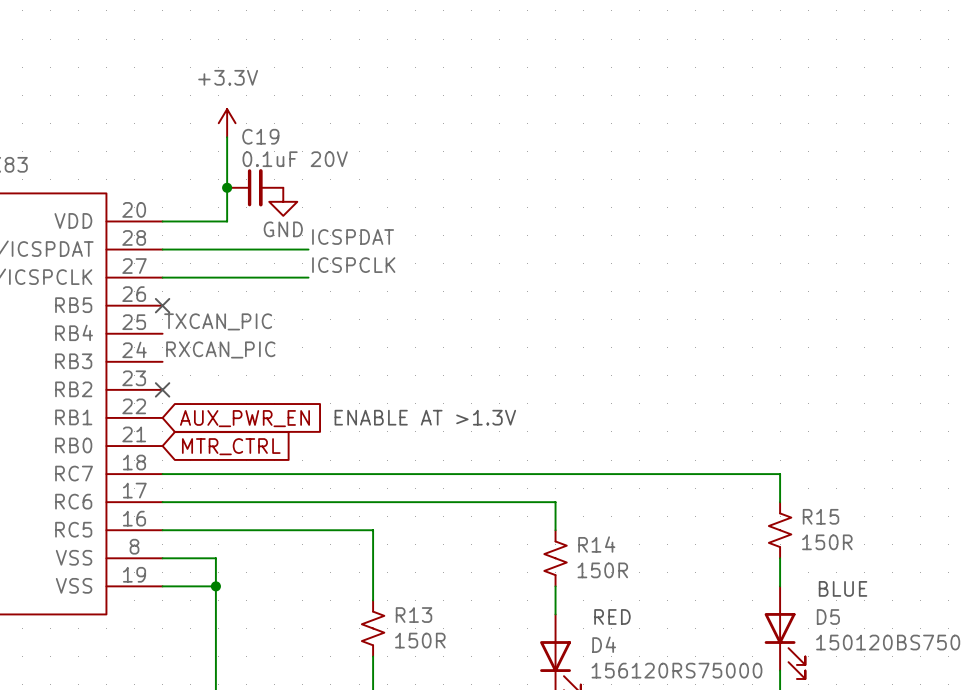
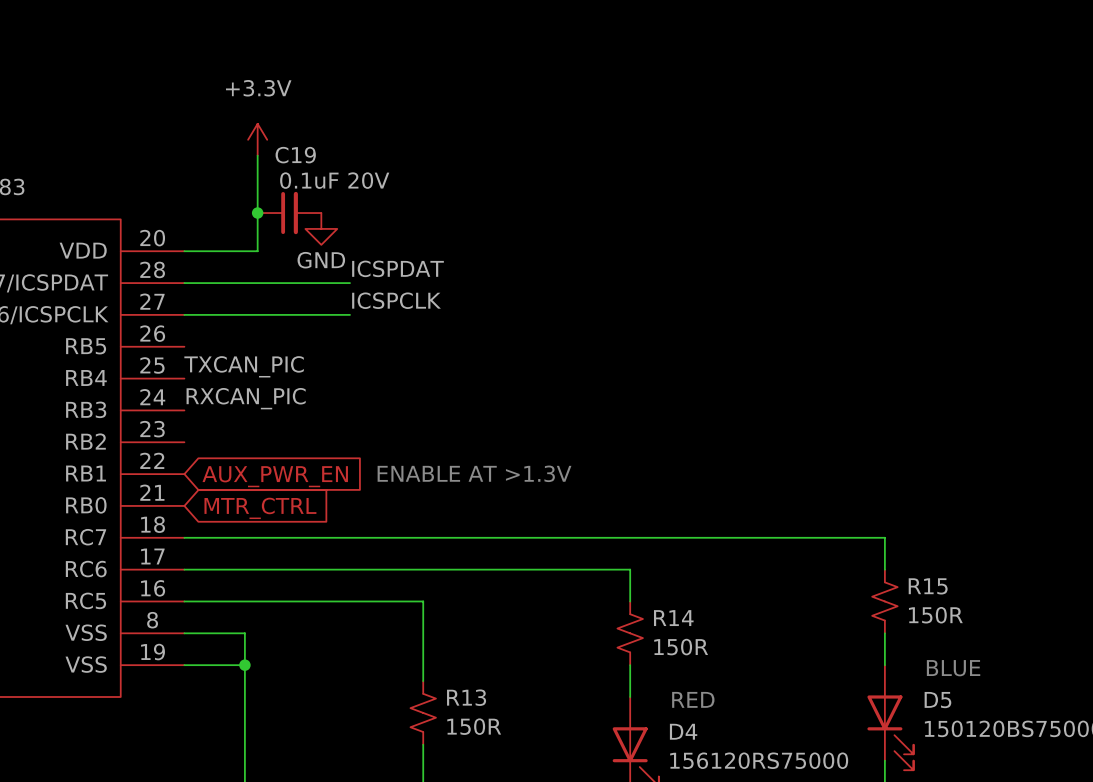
no-connect mark: (162, 305) -> none
no-connect mark: (162, 389) -> none

